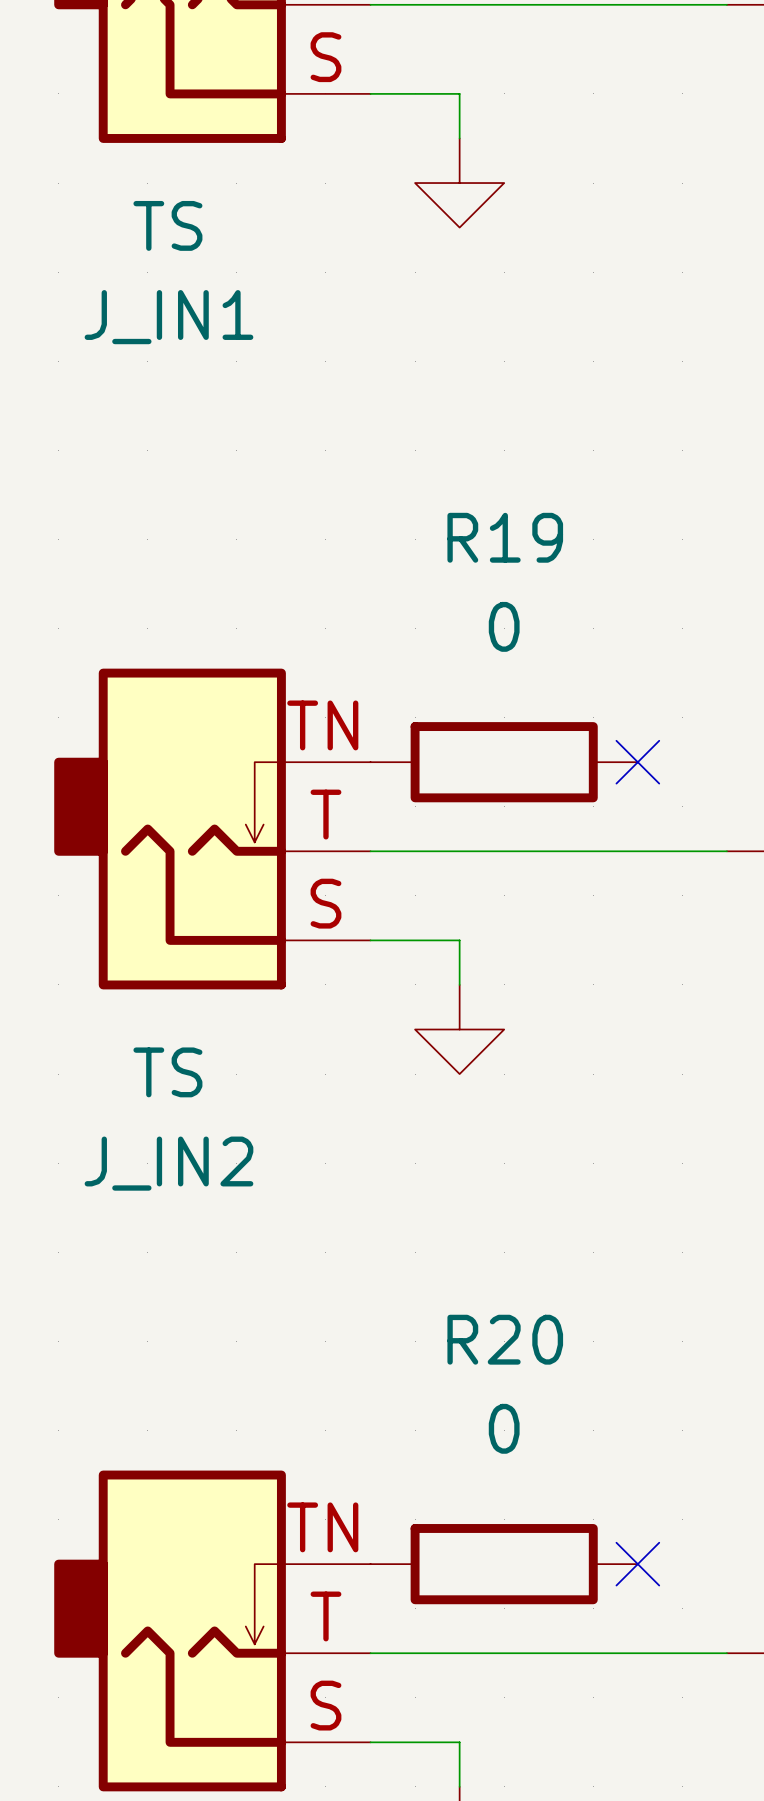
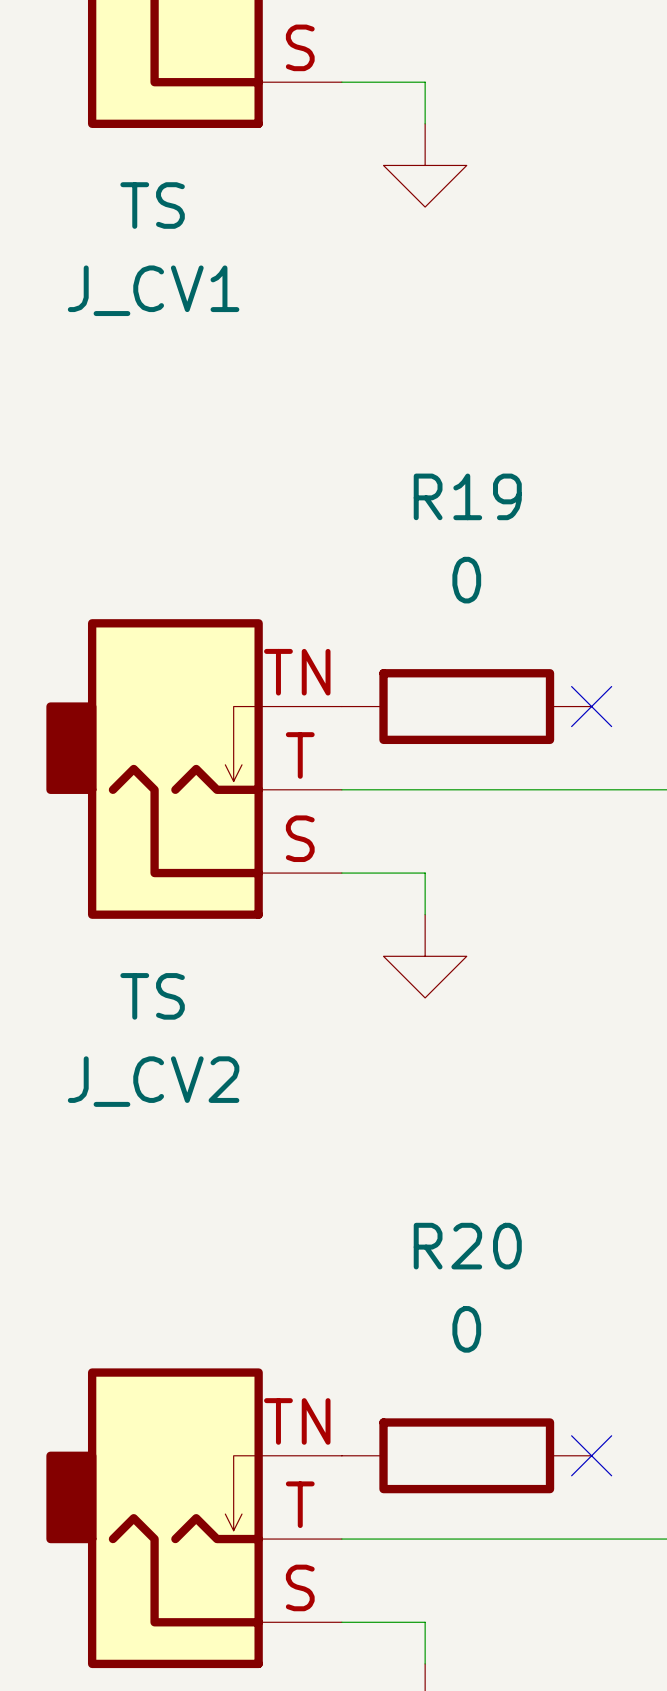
J_IN1 name: J_IN1 (168, 317) -> J_CV1 (153, 290)
J_IN2 name: J_IN2 (168, 1163) -> J_CV2 (153, 1081)

